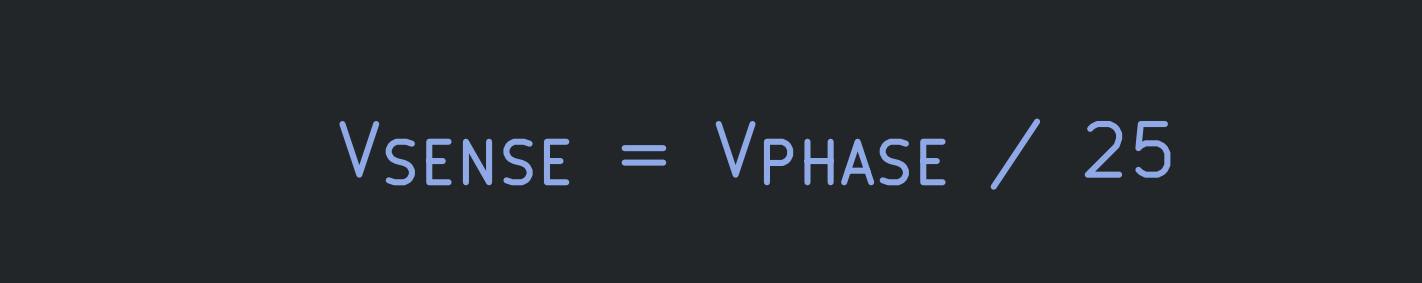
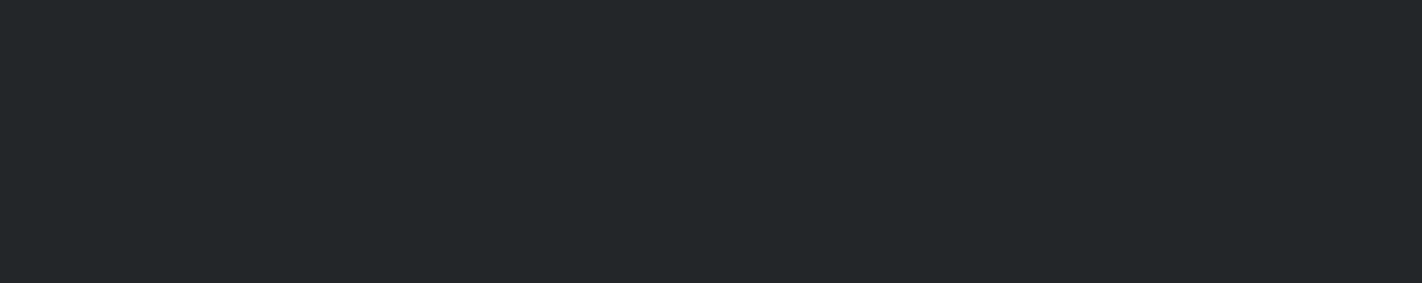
text: VSENSE = VPHASE / 25 (754, 154) -> none

